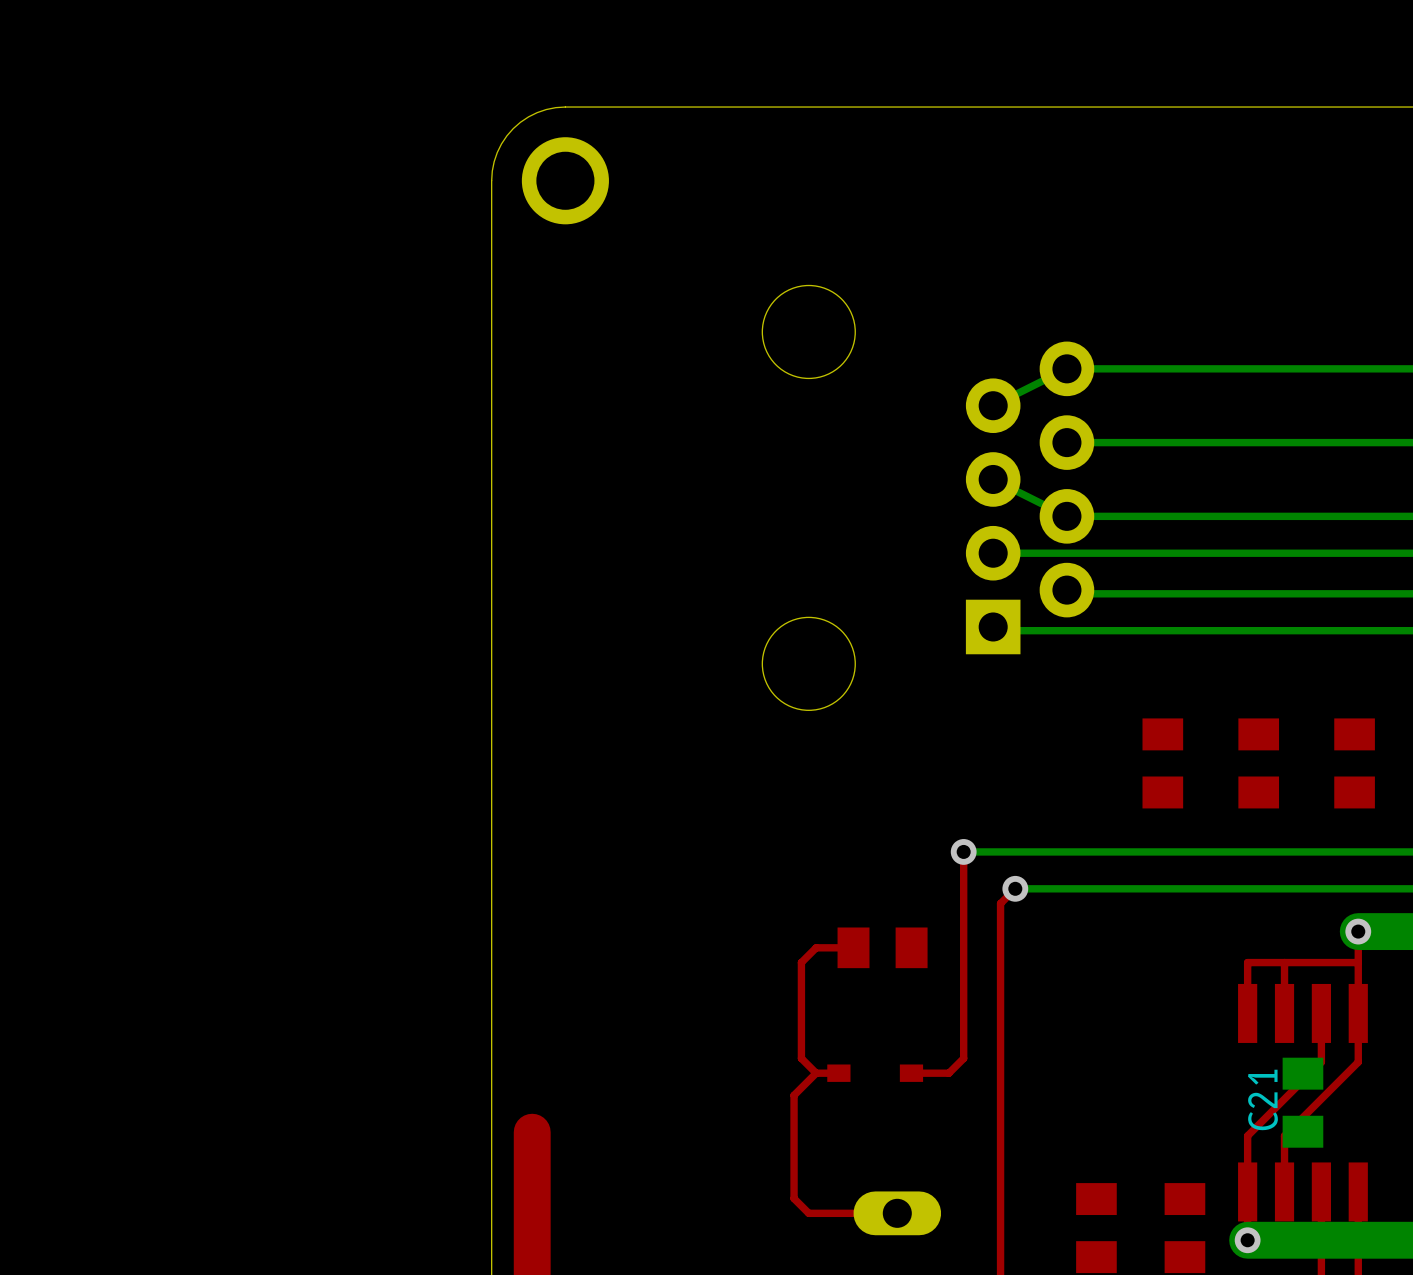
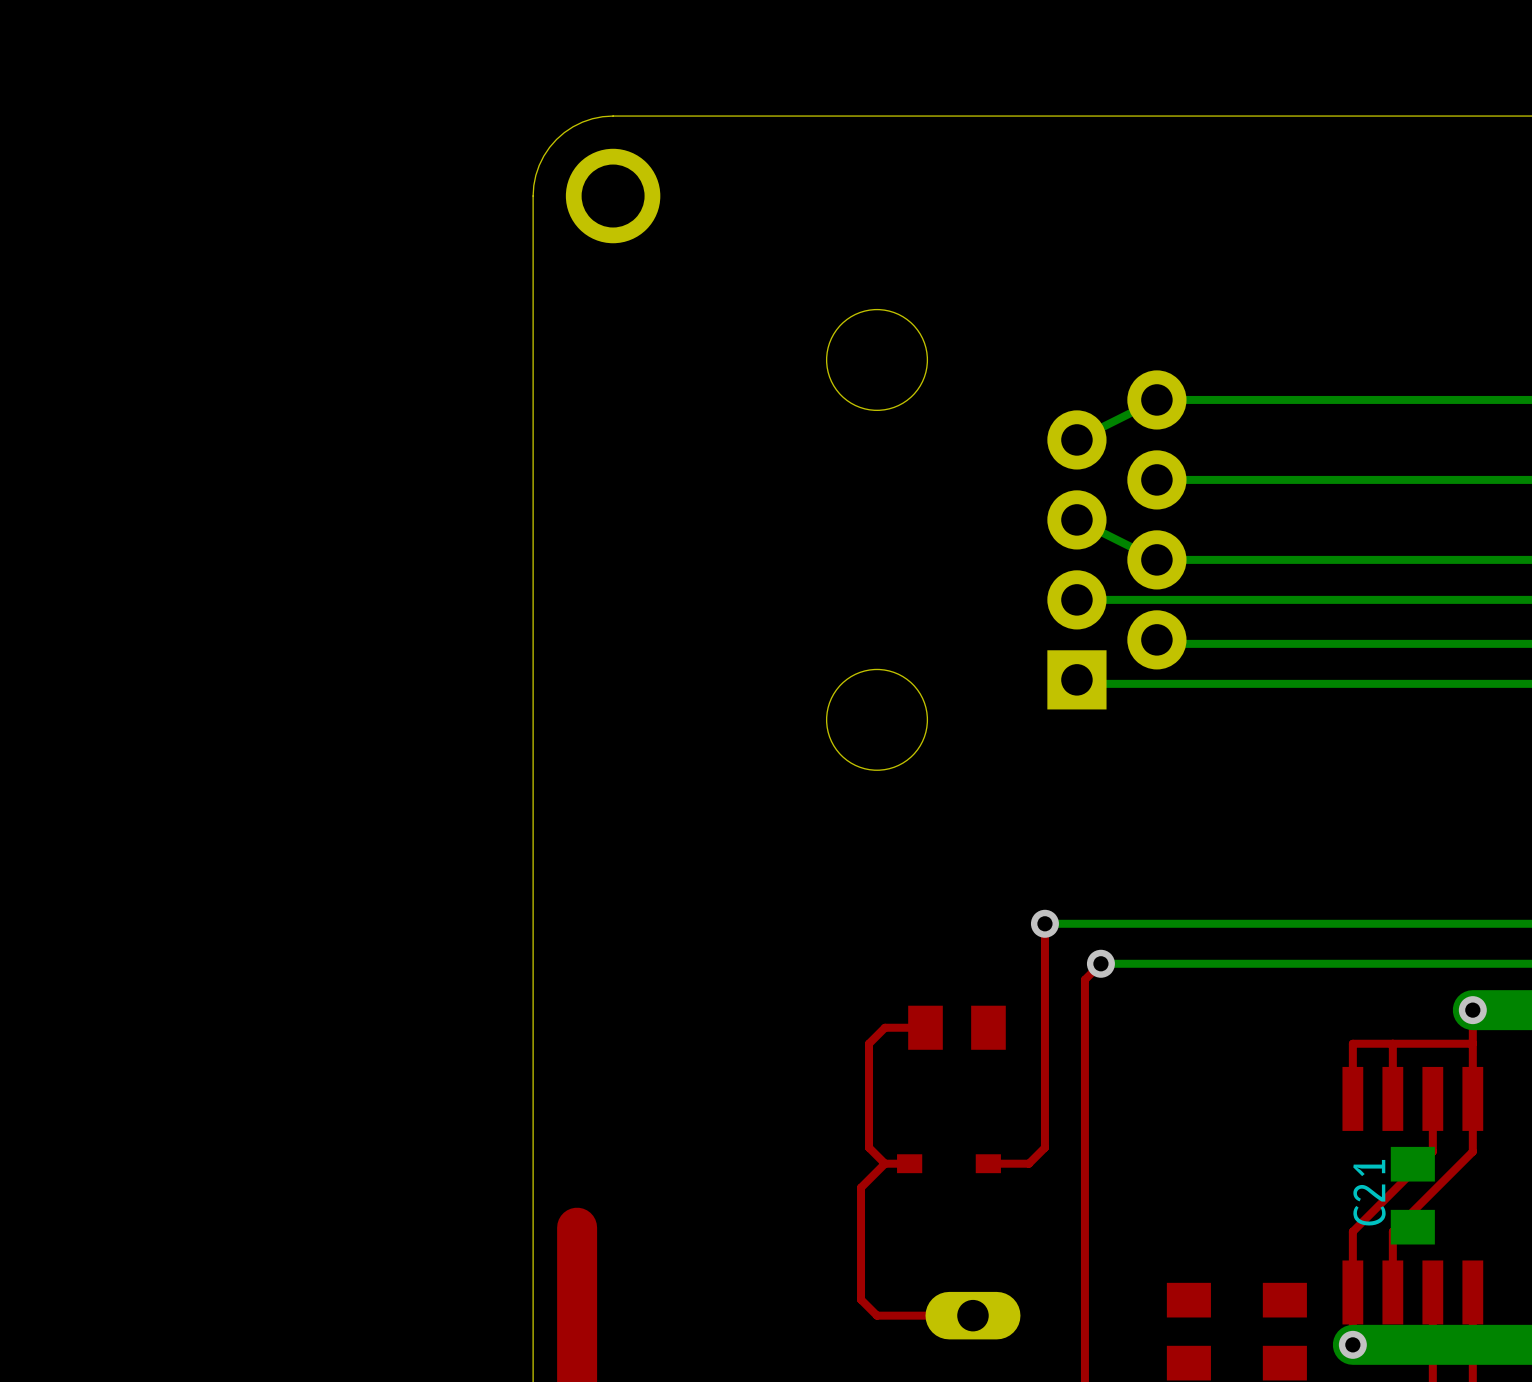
part: (1162, 763) -> none
part: (1258, 763) -> none
part: (1354, 763) -> none

